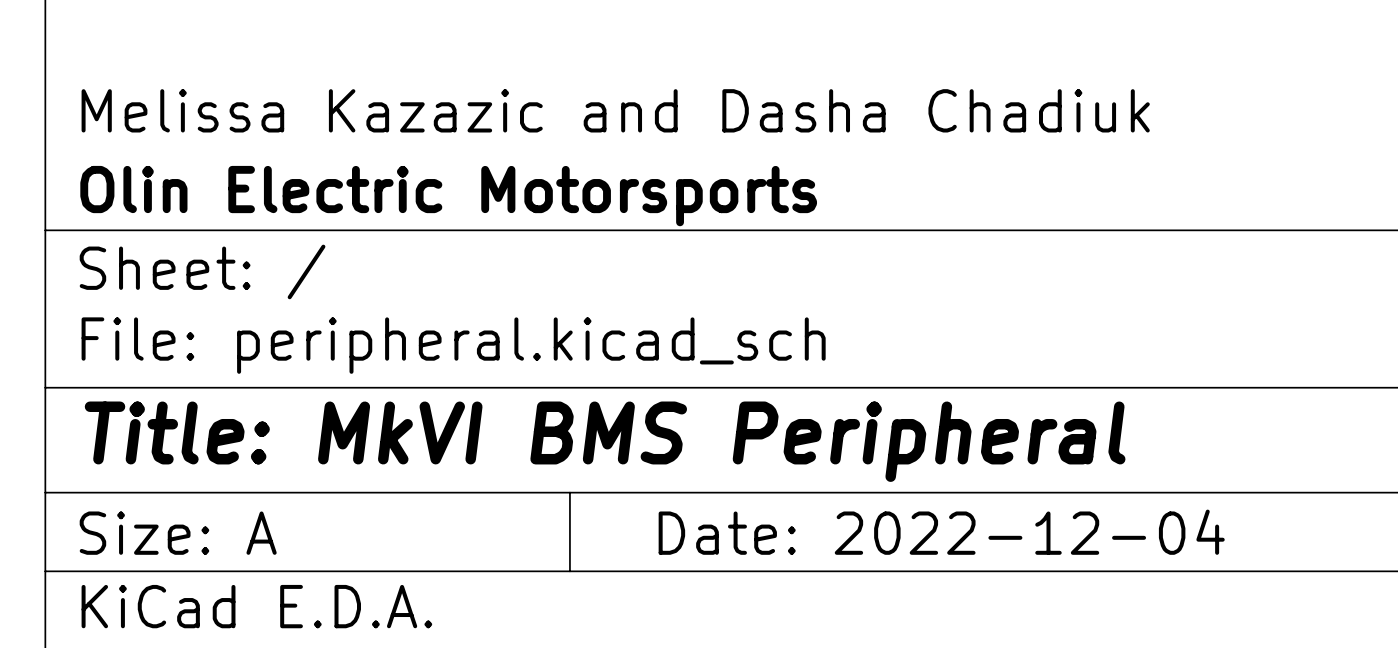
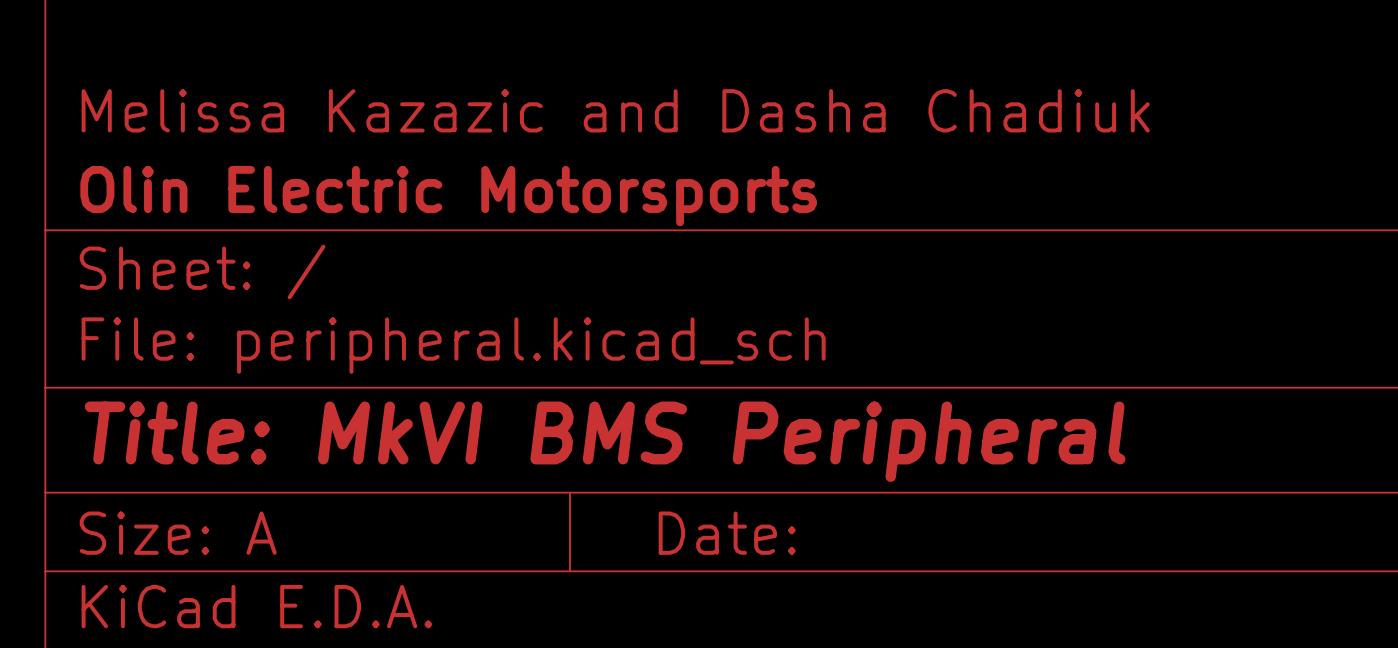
title block: Date: 2022-12-04 (941, 532) -> Date: (727, 533)

